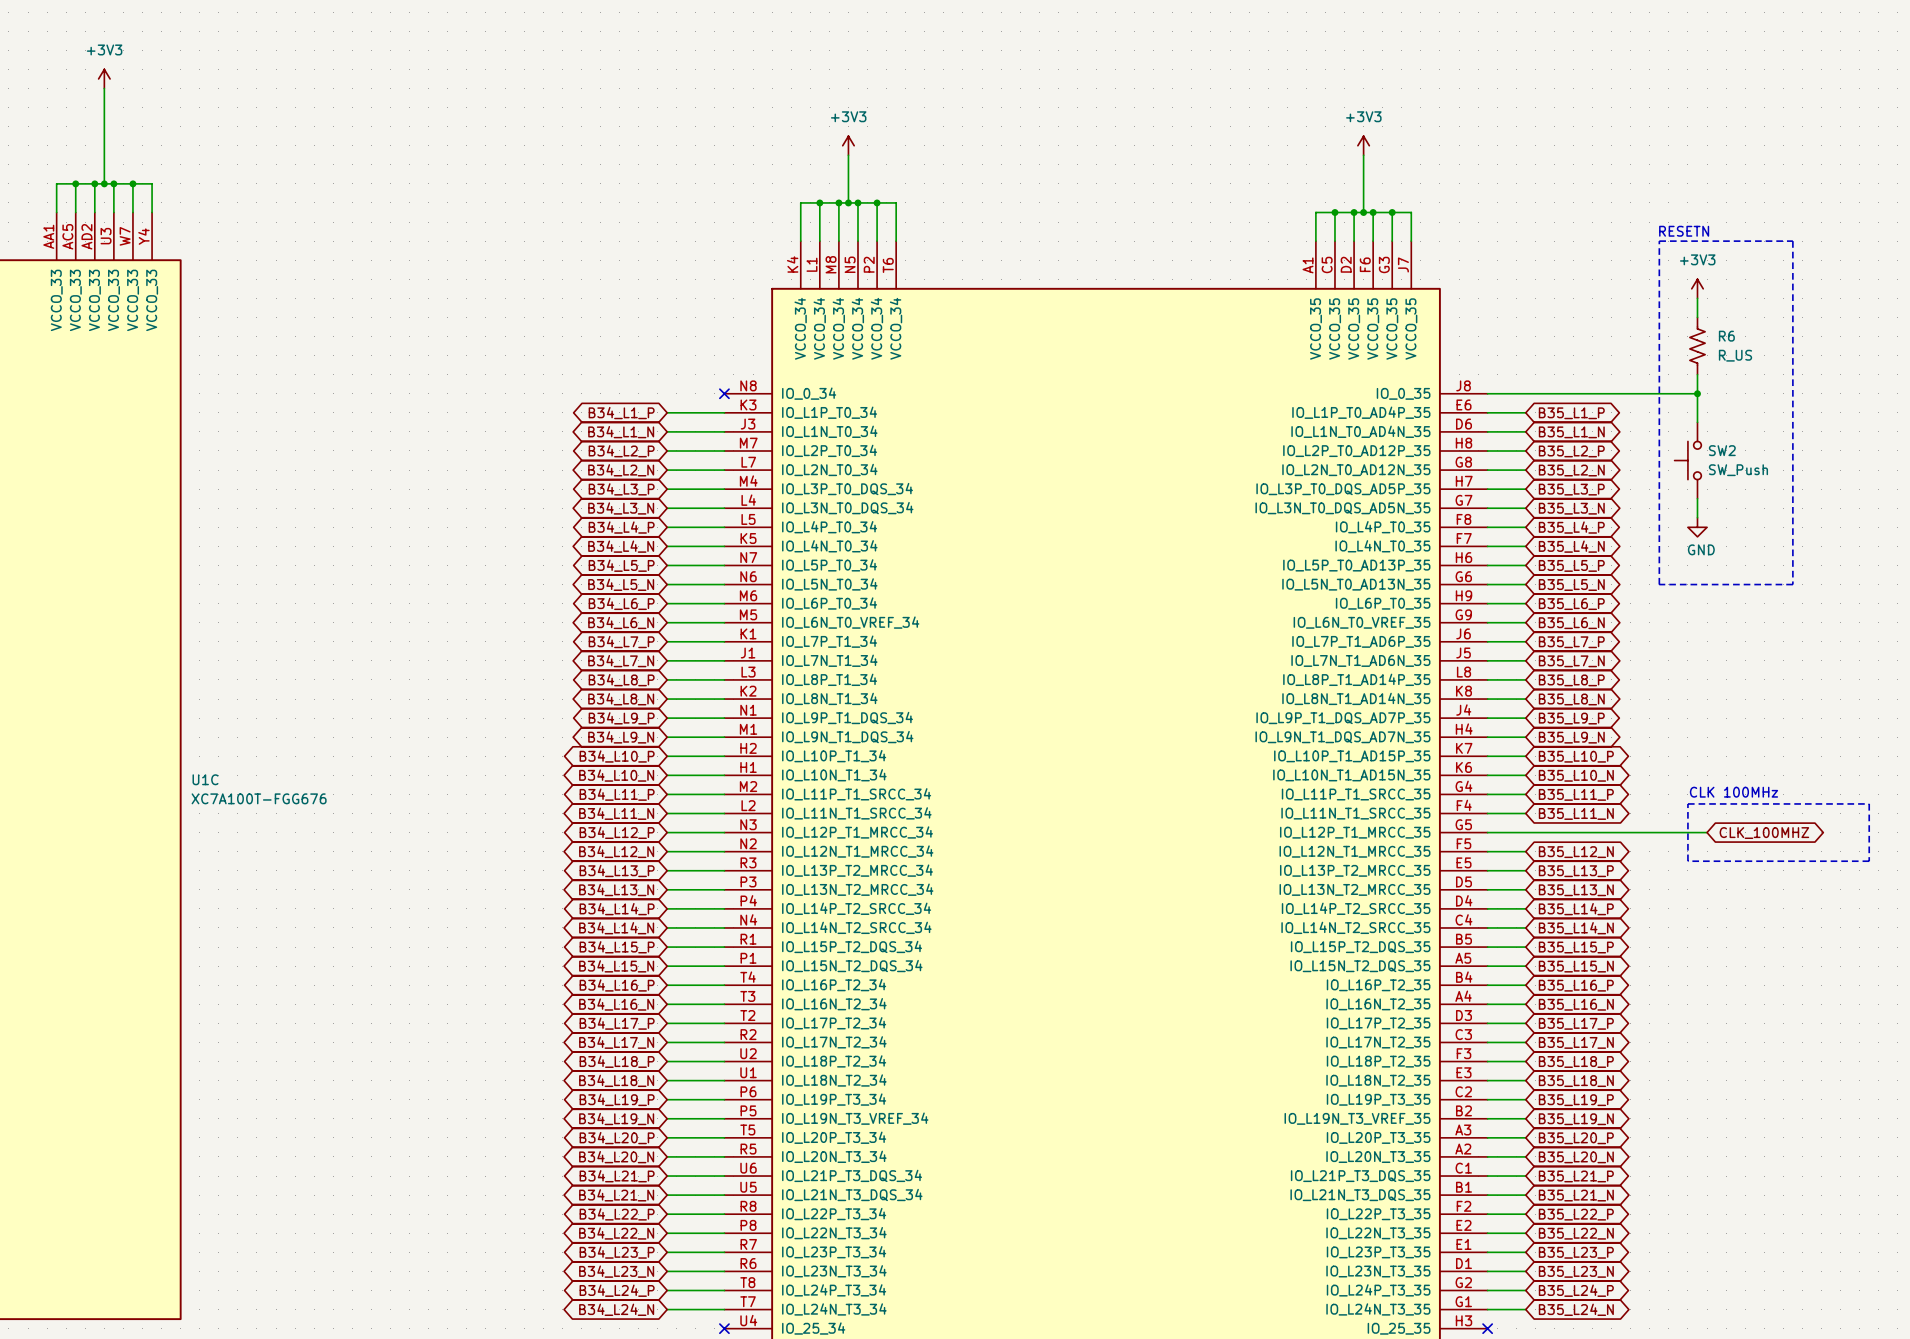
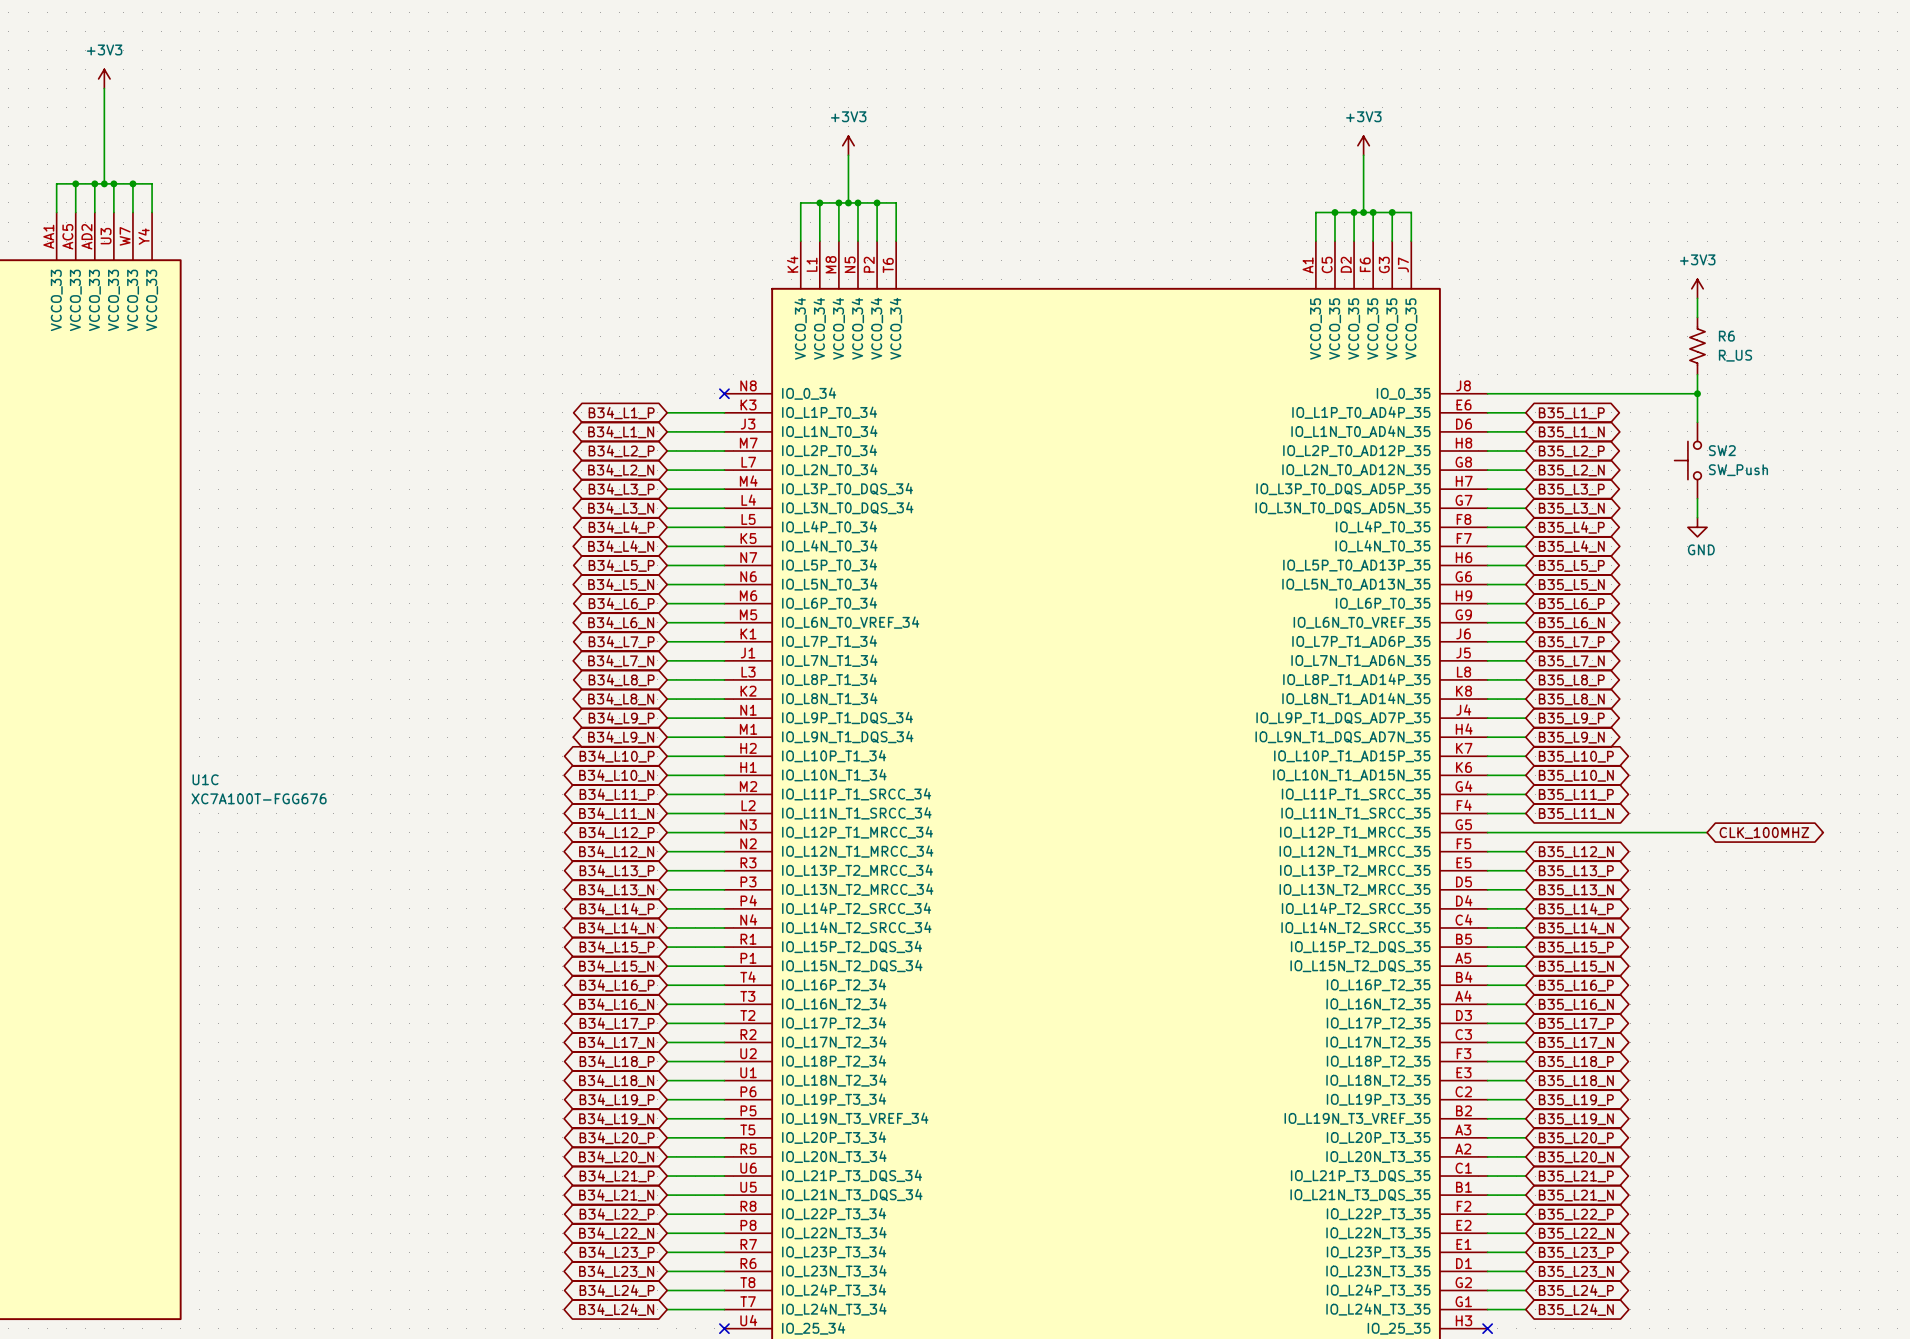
text: RESETN (1684, 231) -> none
line: (1659, 241) (1792, 241) (1792, 584) (1659, 584) (1659, 241) -> none
text: CLK 100MHz (1733, 792) -> none
line: (1687, 803) (1869, 803) (1869, 861) (1687, 861) (1687, 803) -> none

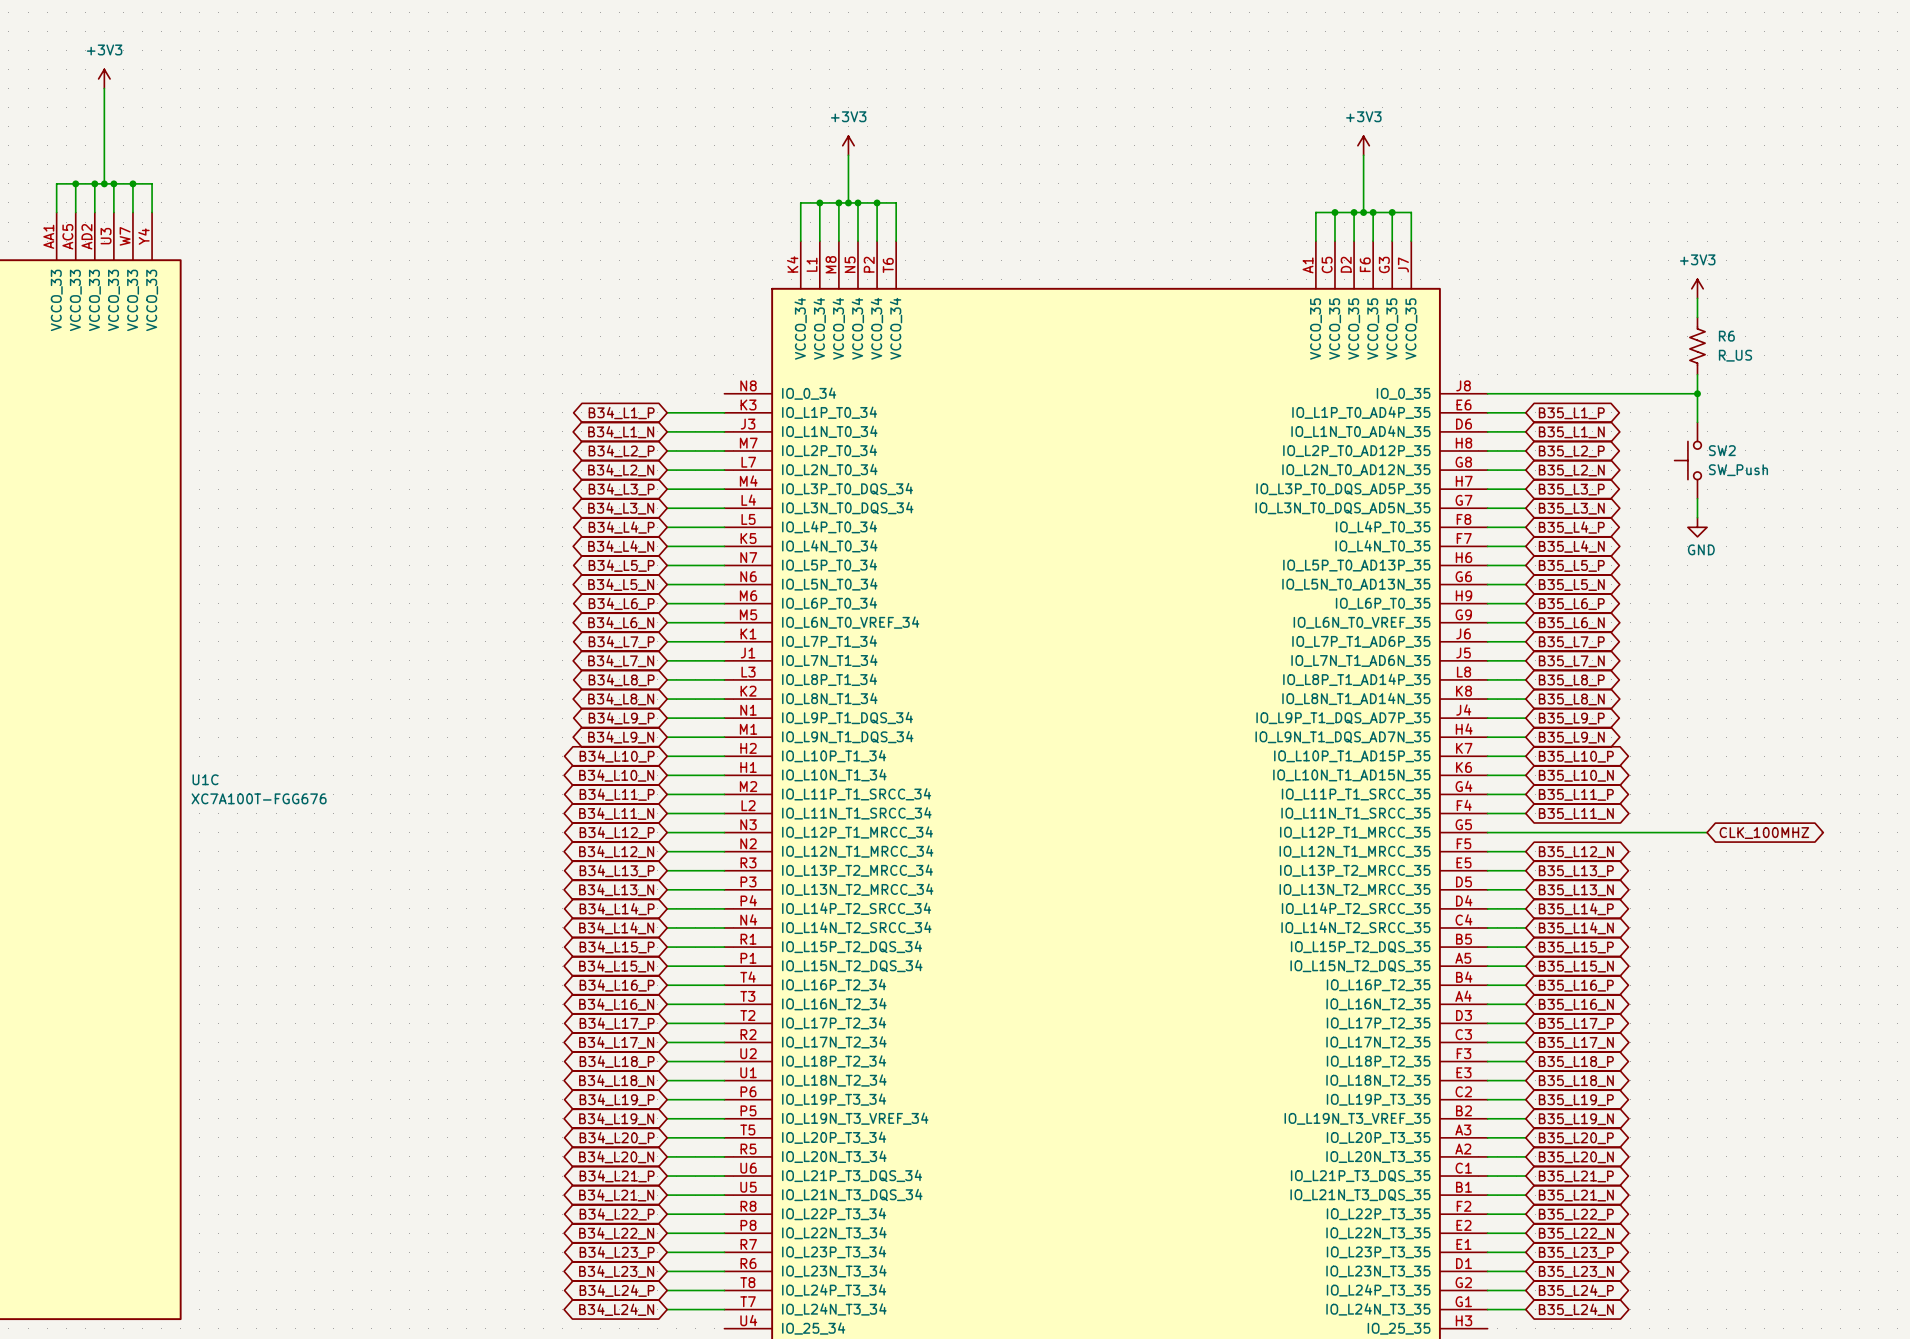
no-connect mark: (724, 393) -> none
no-connect mark: (724, 1328) -> none
no-connect mark: (1487, 1328) -> none

